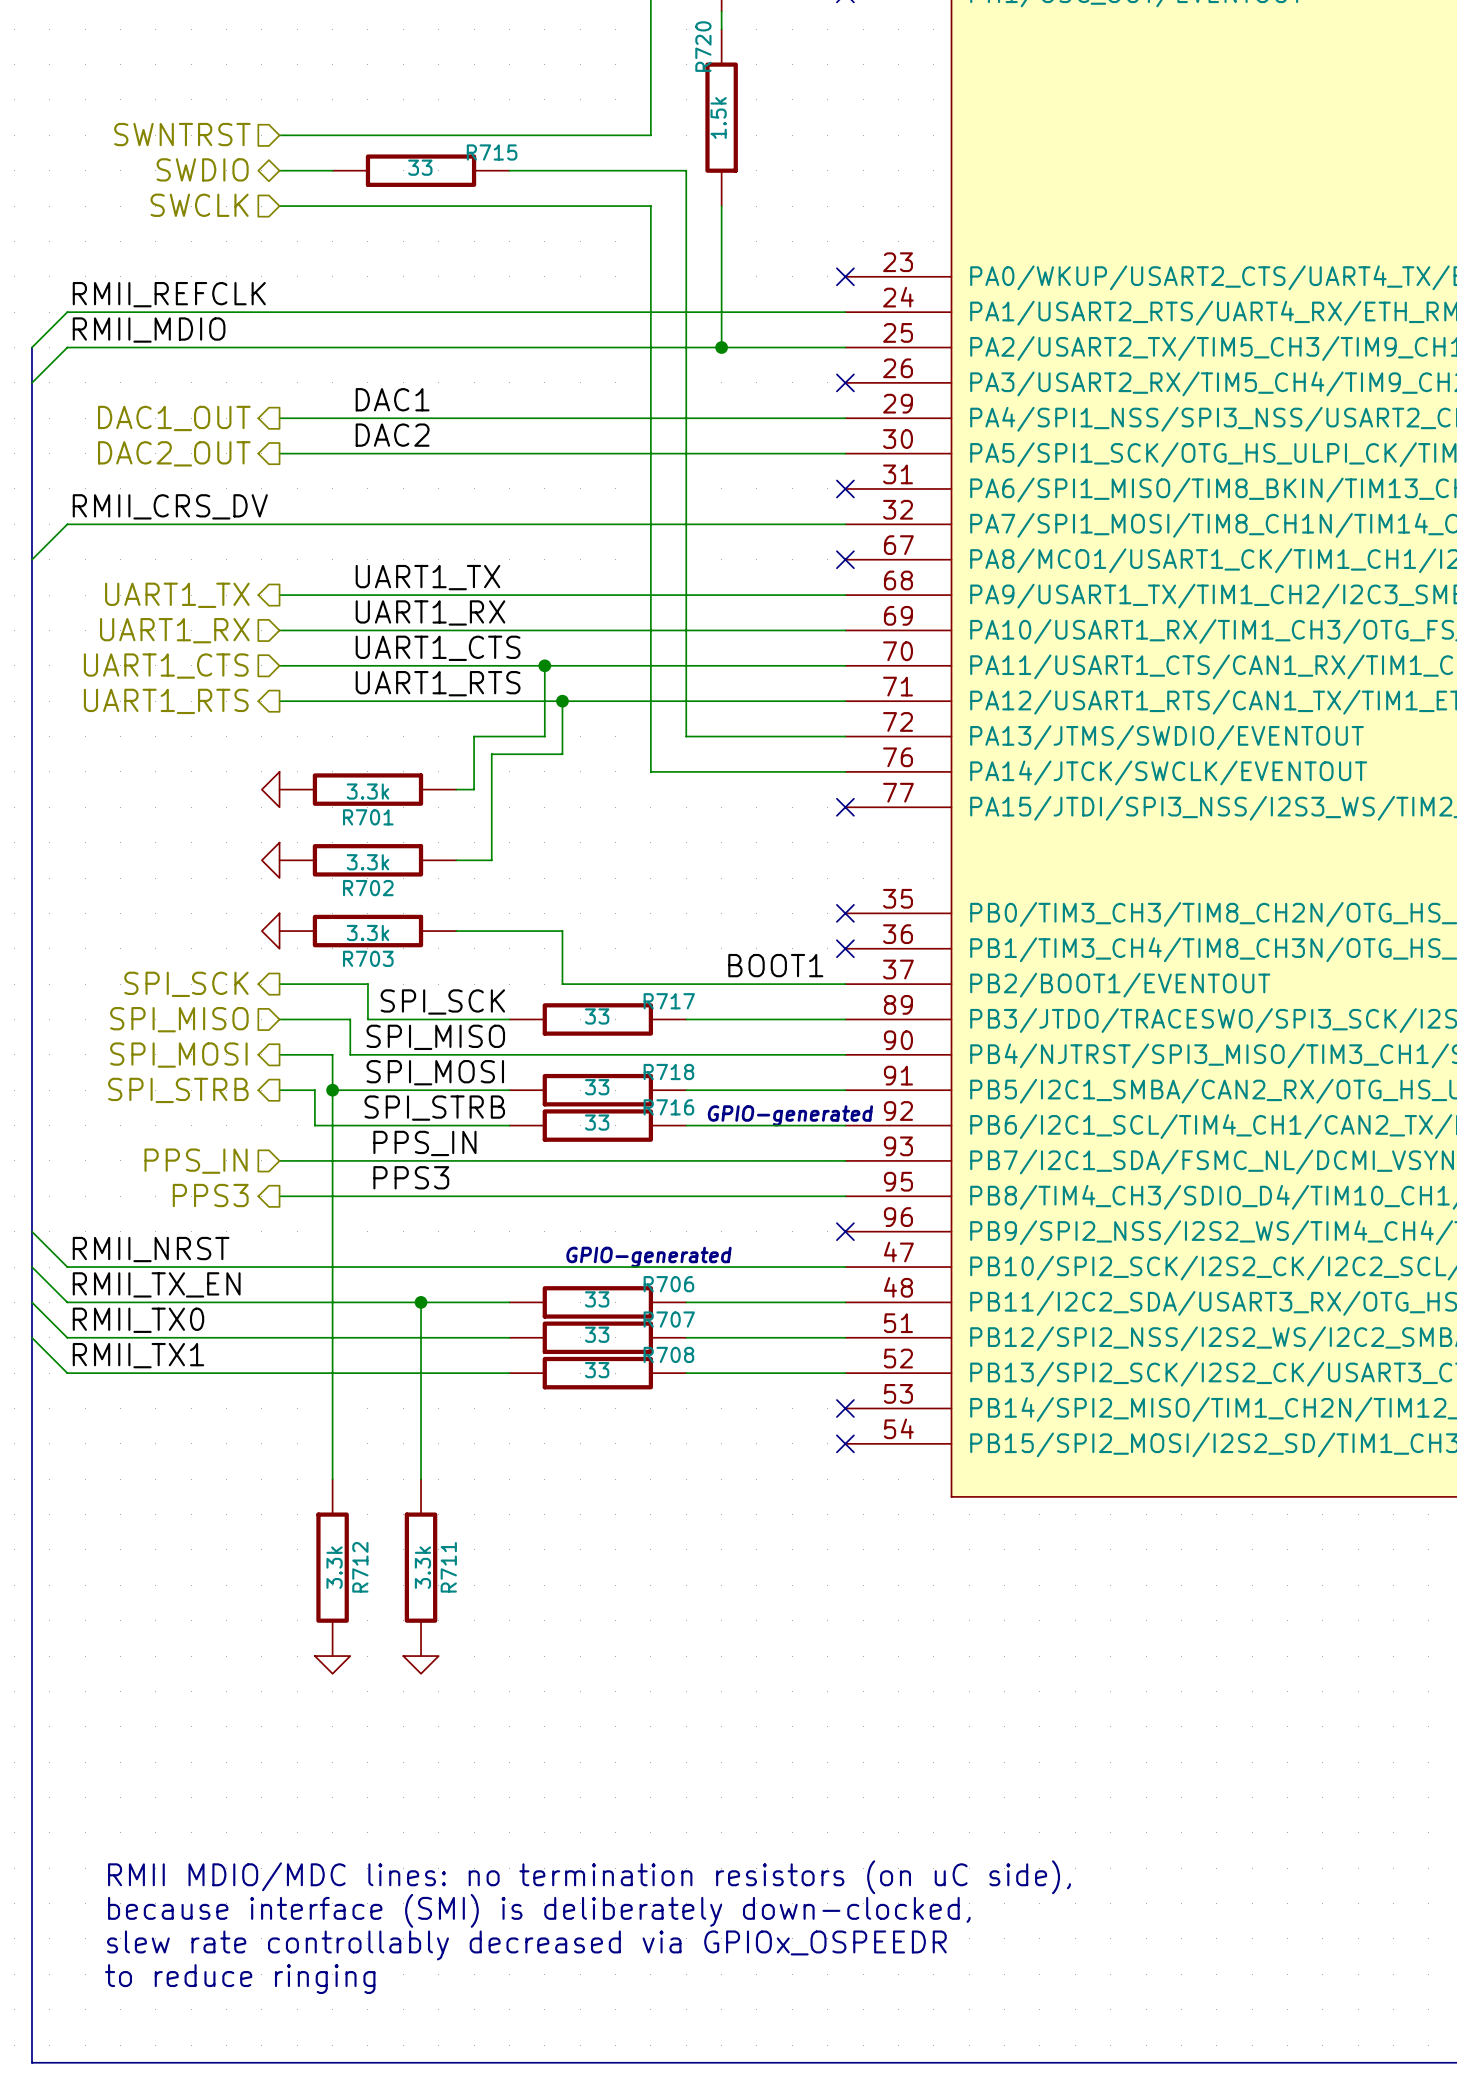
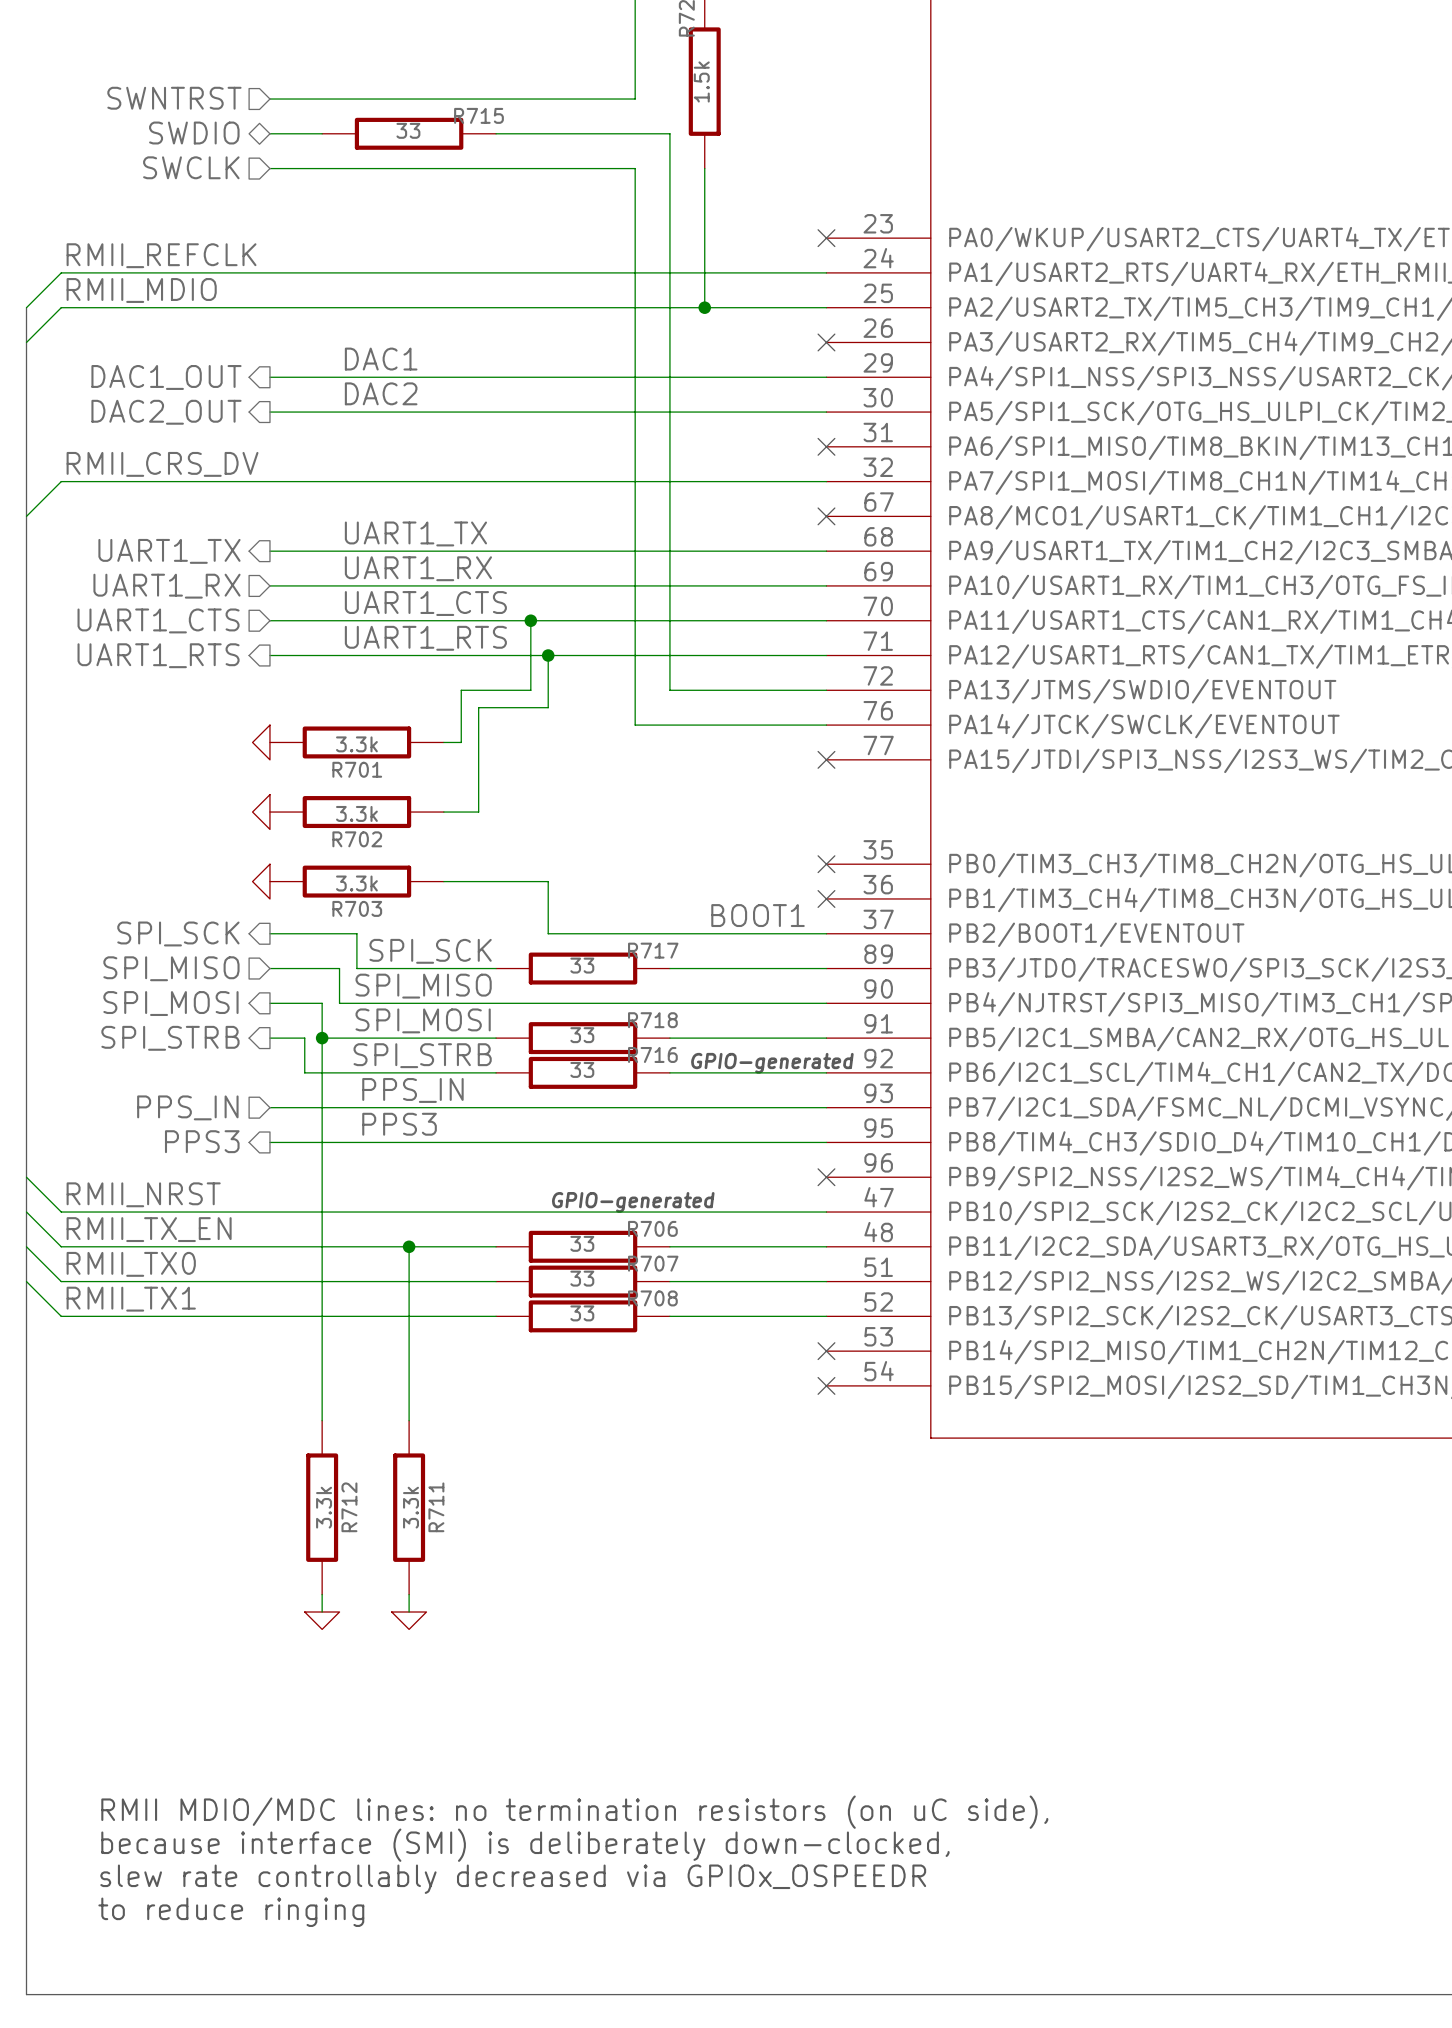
wire: none -> (322, 1594) (322, 1612)
wire: none -> (409, 1594) (409, 1612)
power symbol position: (332, 1664) -> (322, 1620)
power symbol position: (421, 1664) -> (409, 1620)

